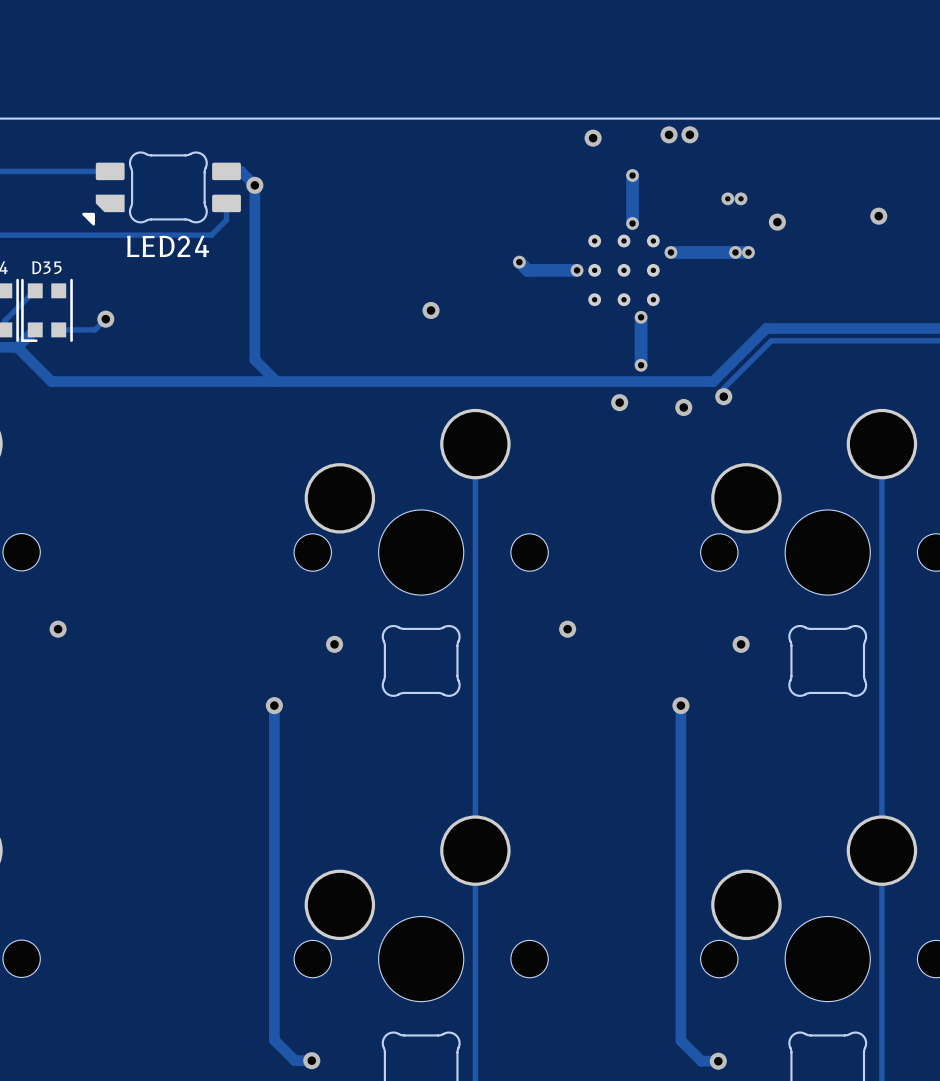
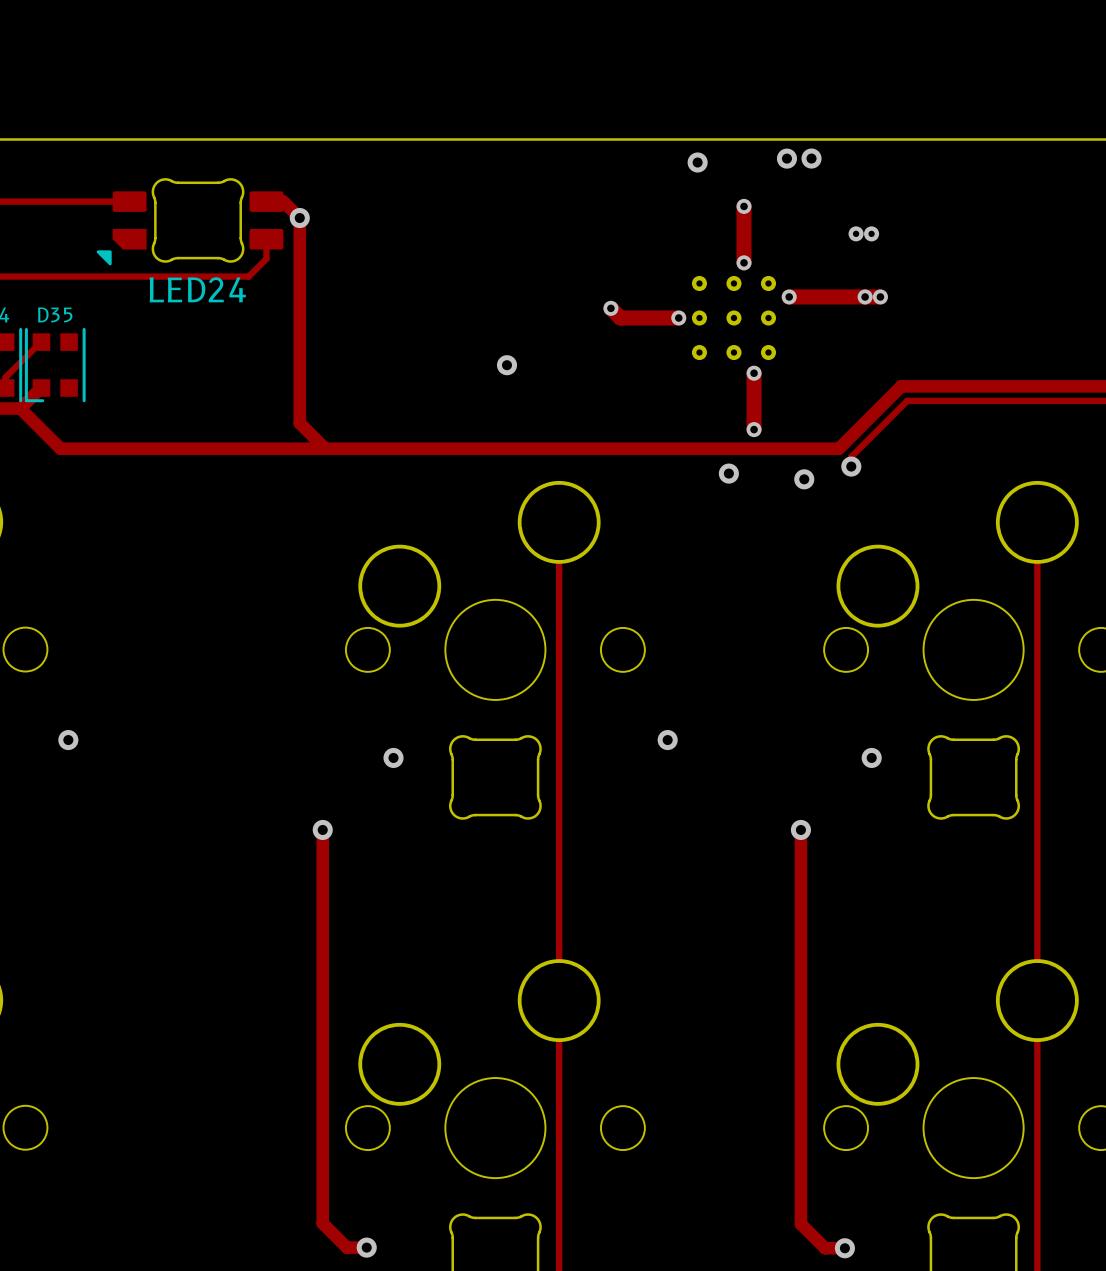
via: (878, 216) -> none
via: (777, 222) -> none
track: (105, 319) (95, 329) (58, 329) -> none
via: (105, 319) -> none

